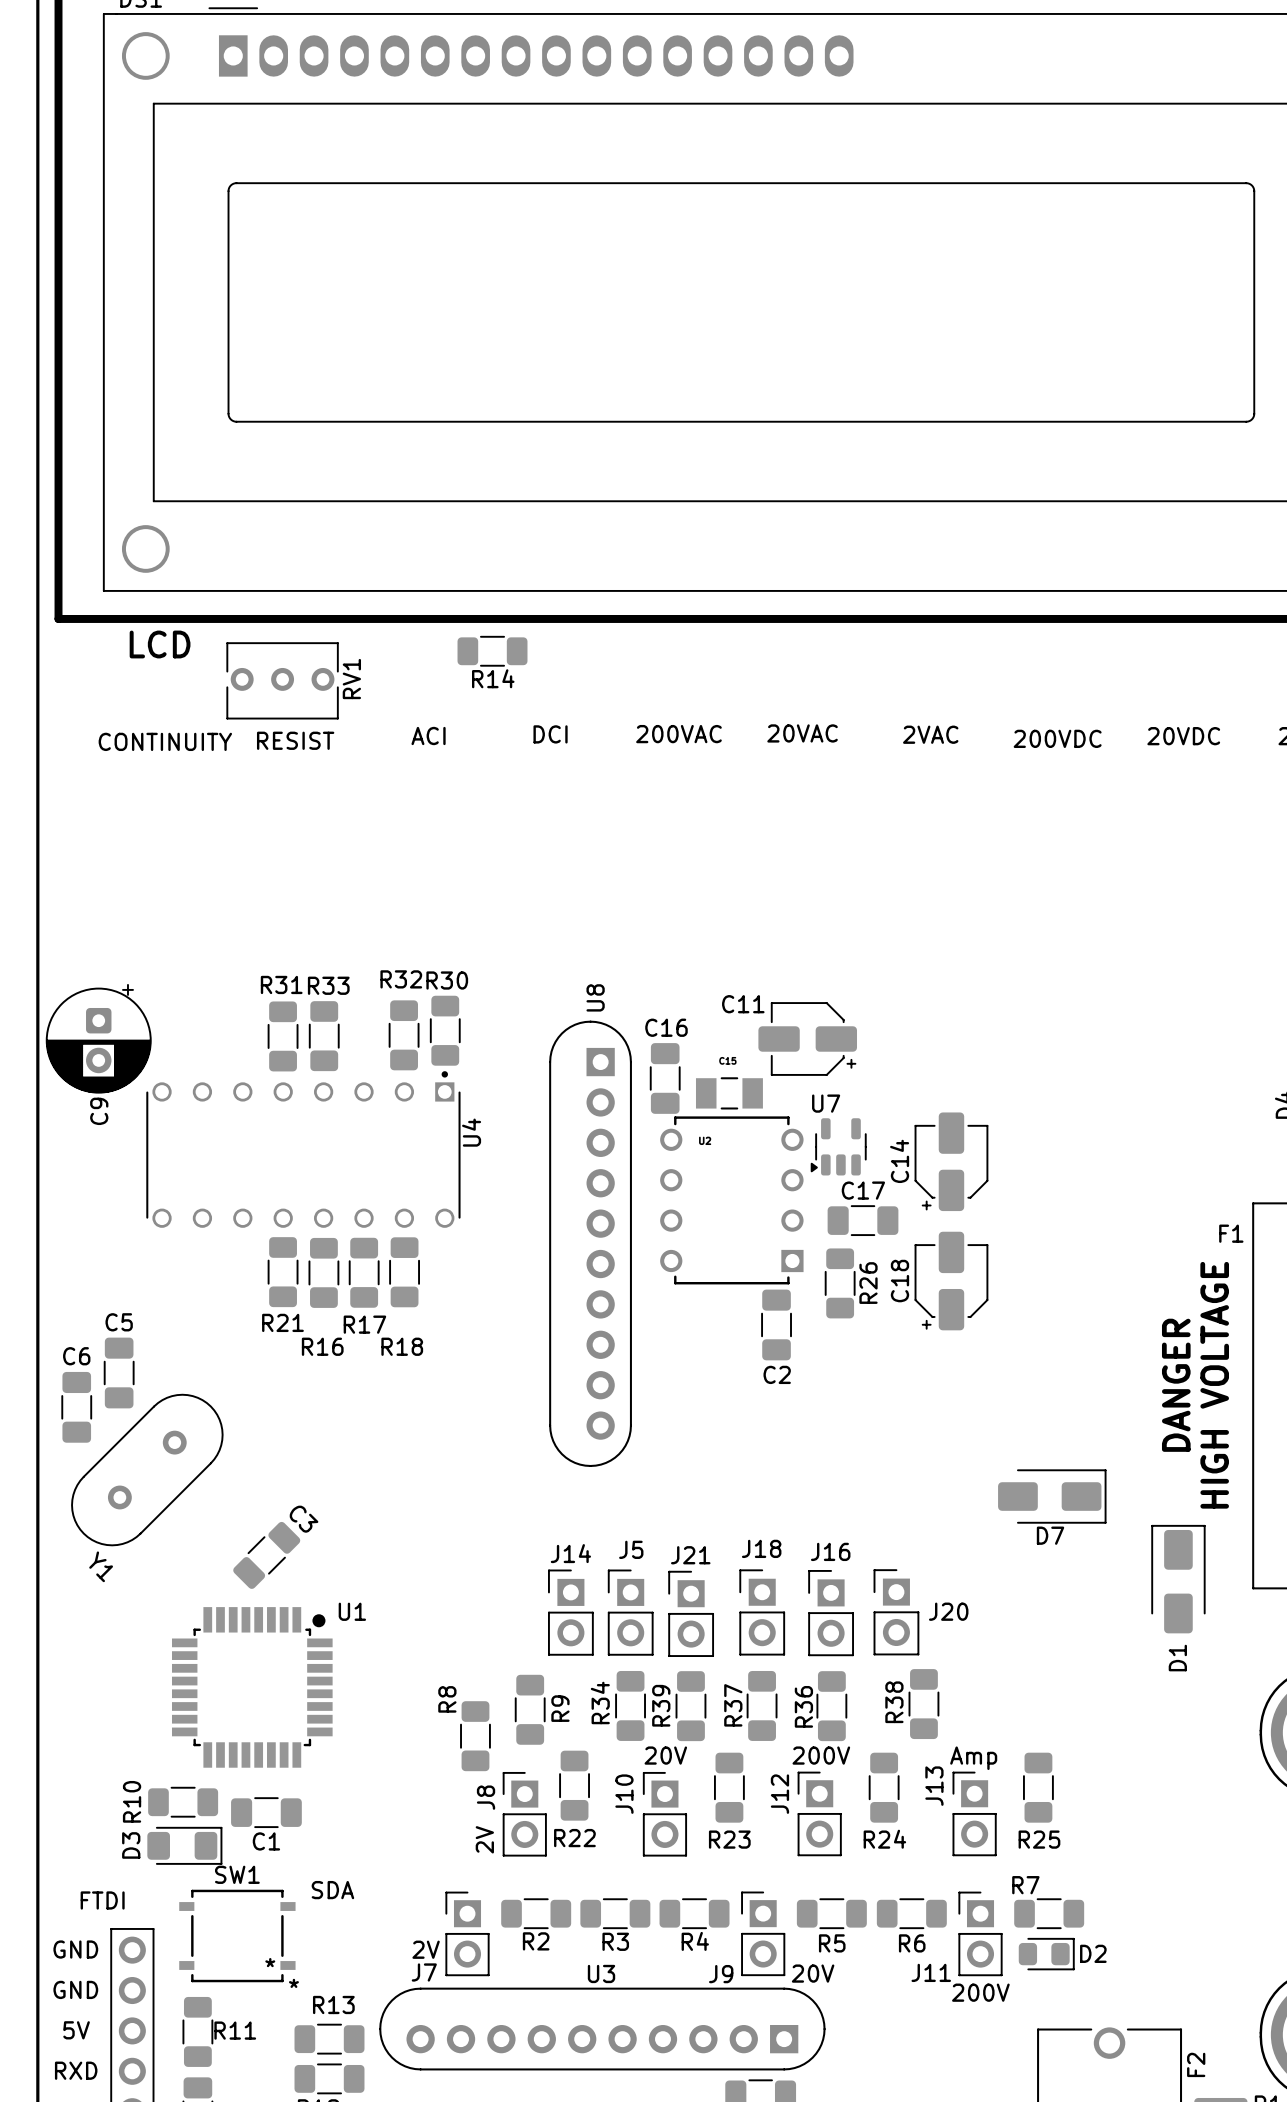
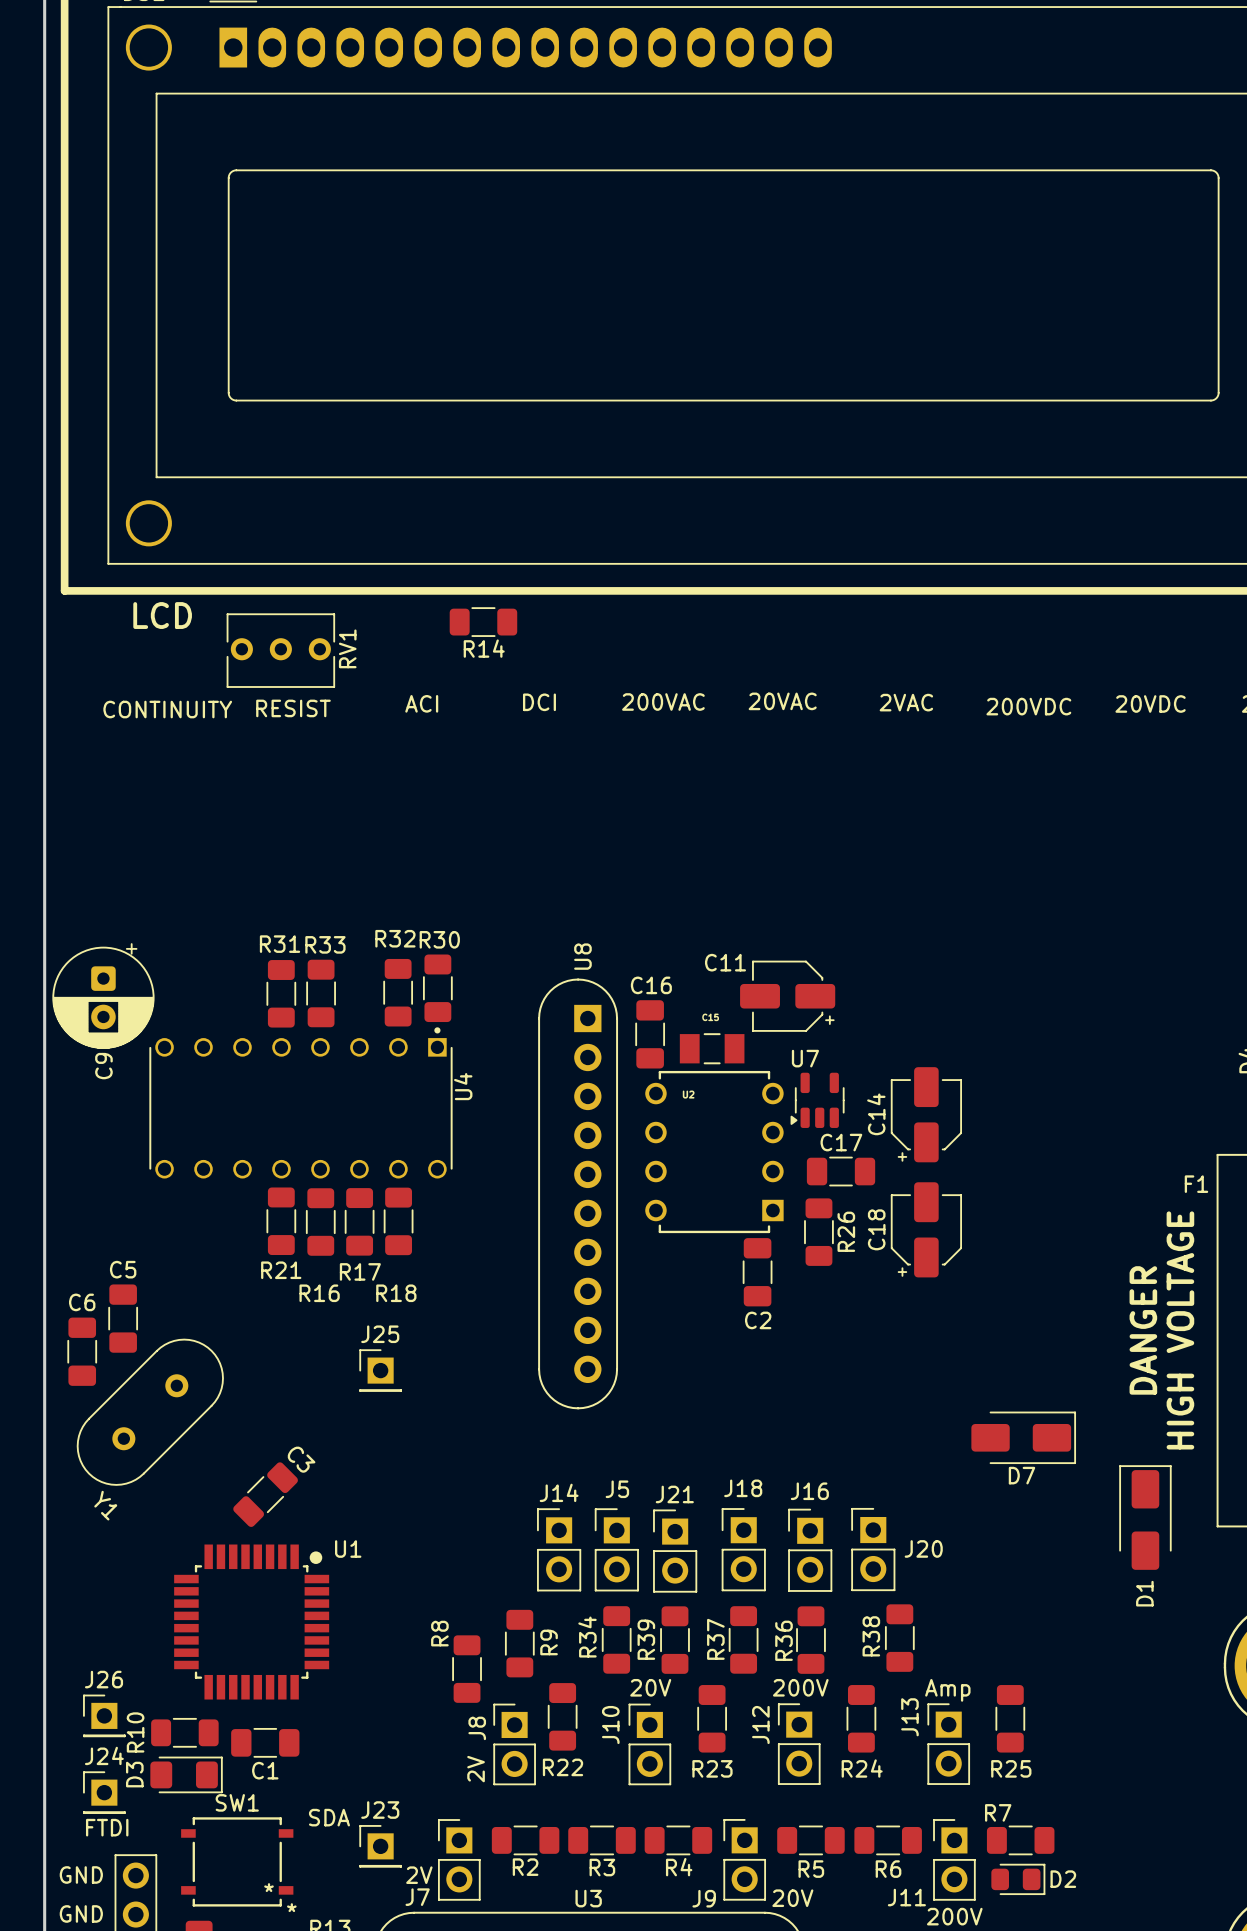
J25: none -> (380, 1370)
J26: none -> (104, 1715)
J24: none -> (104, 1792)
J23: none -> (380, 1846)

